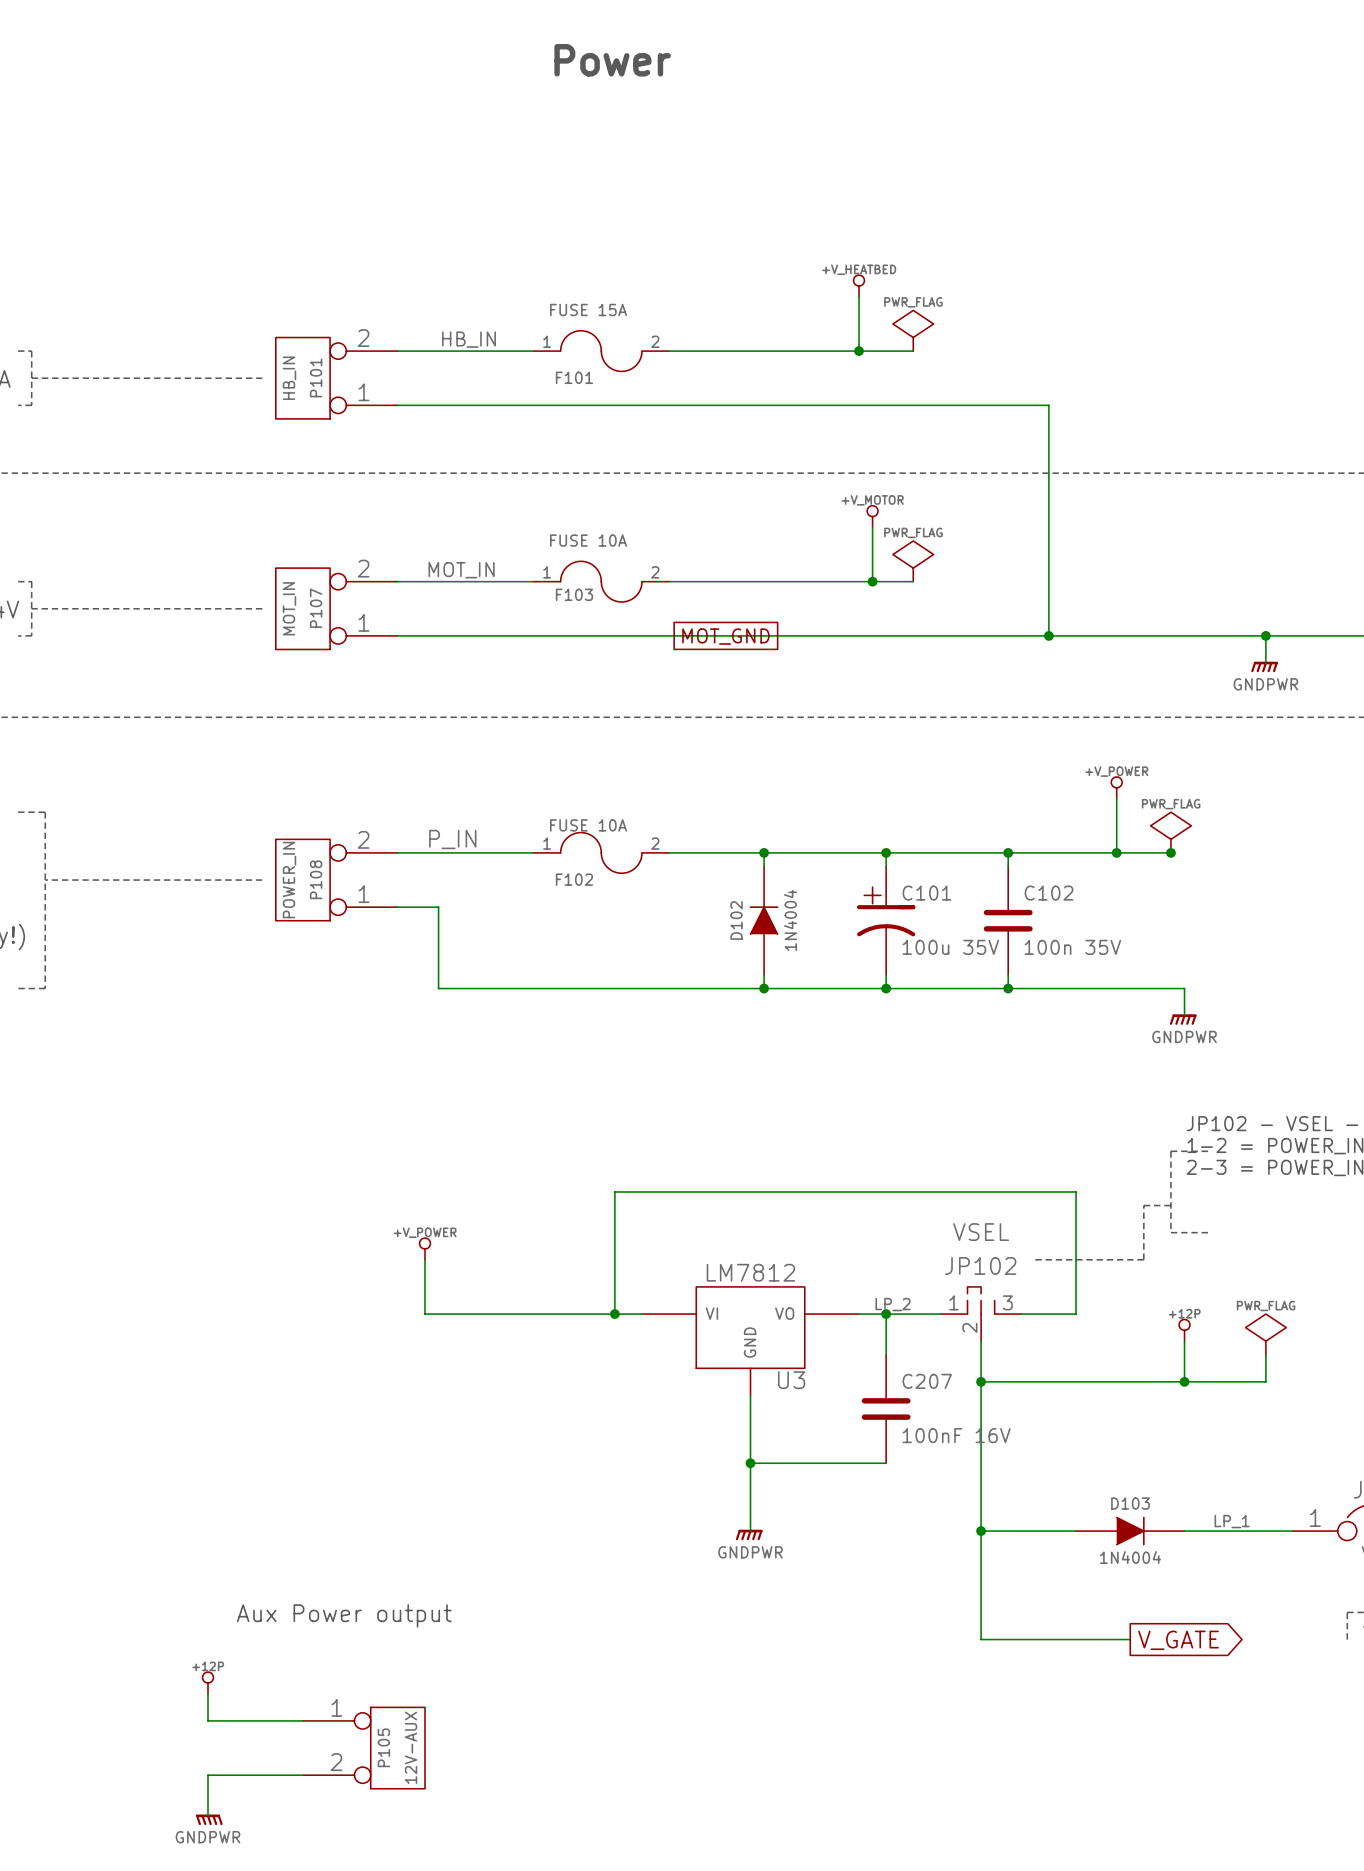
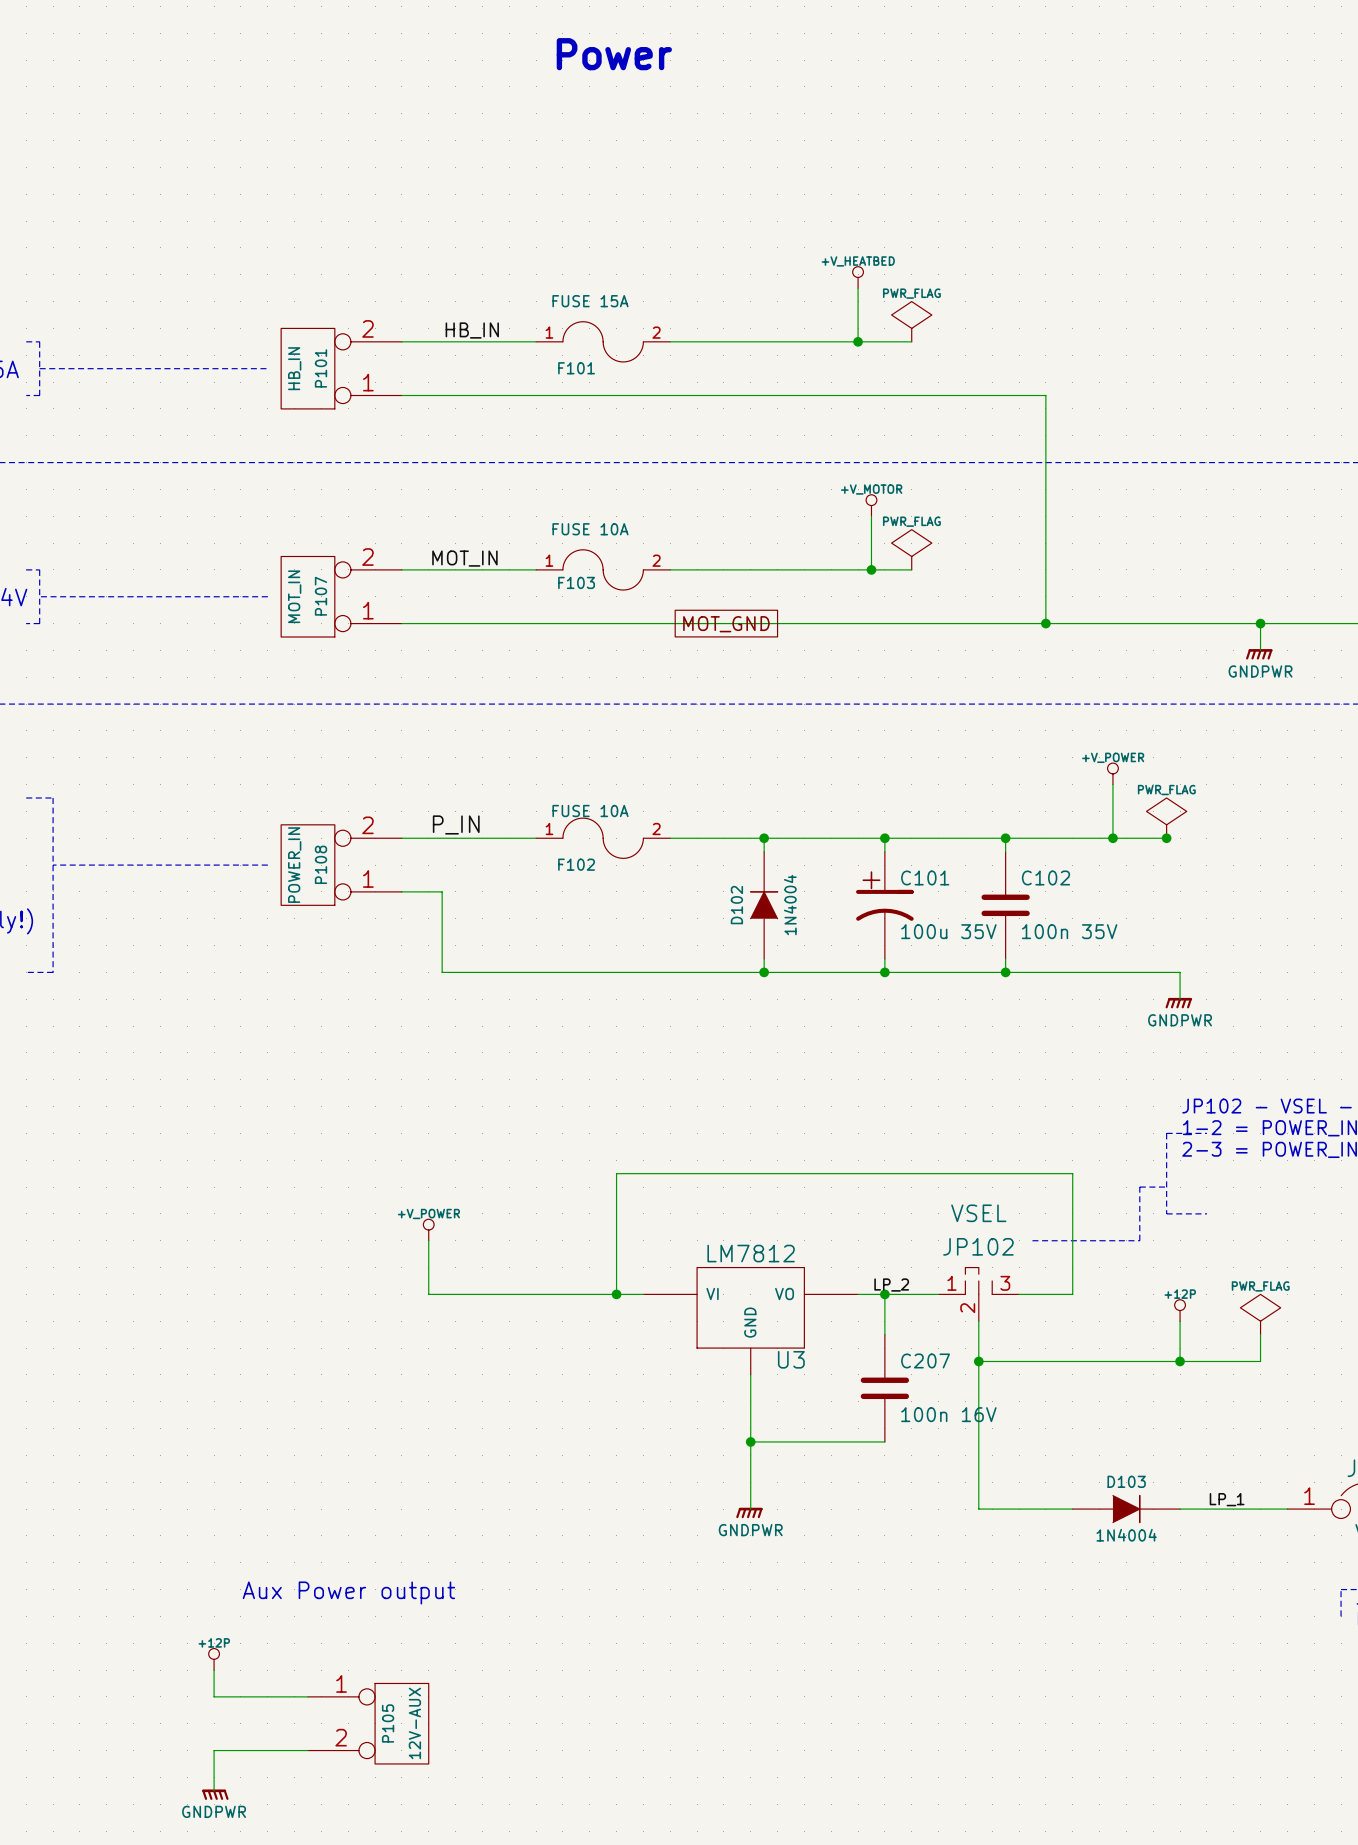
C207 value: 100nF 16V (956, 1435) -> 100n 16V (948, 1414)
wire: (981, 1531) (981, 1639) (1130, 1639) -> none
junction: (981, 1531) -> none
global label: V_GATE (1178, 1640) -> none

